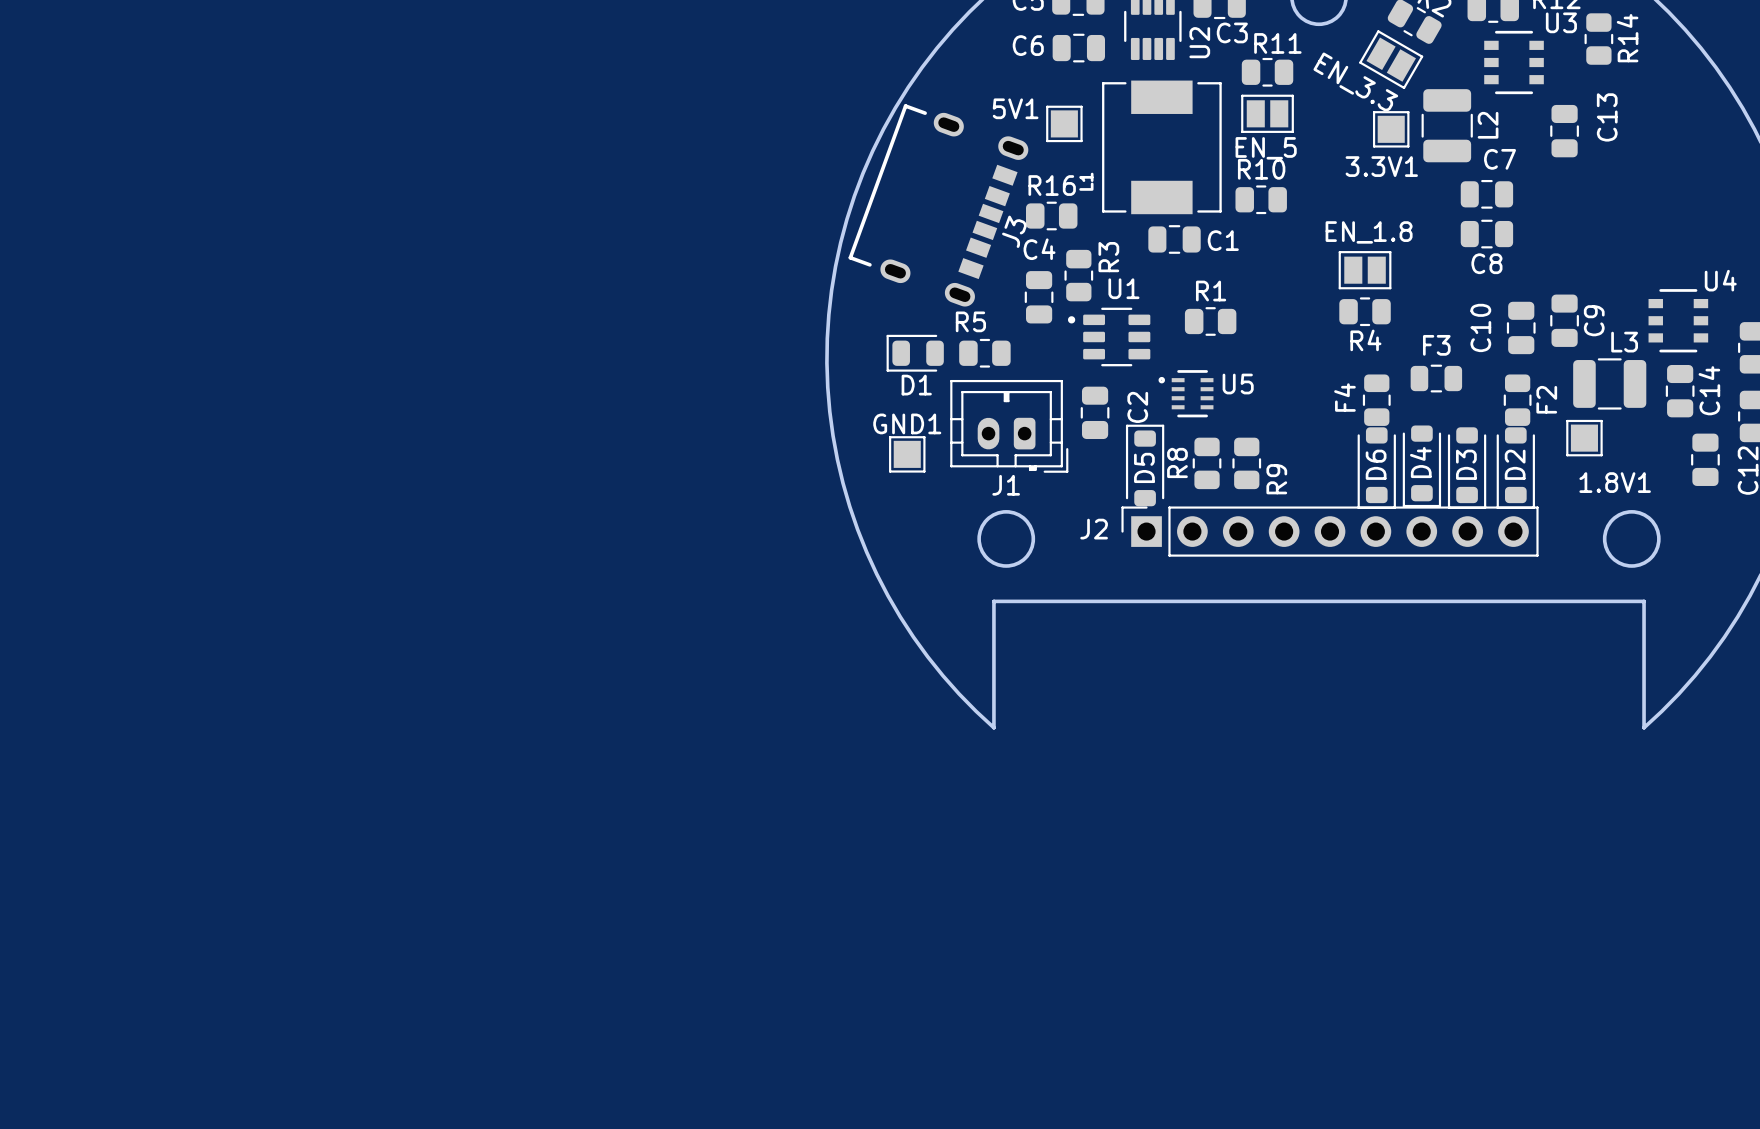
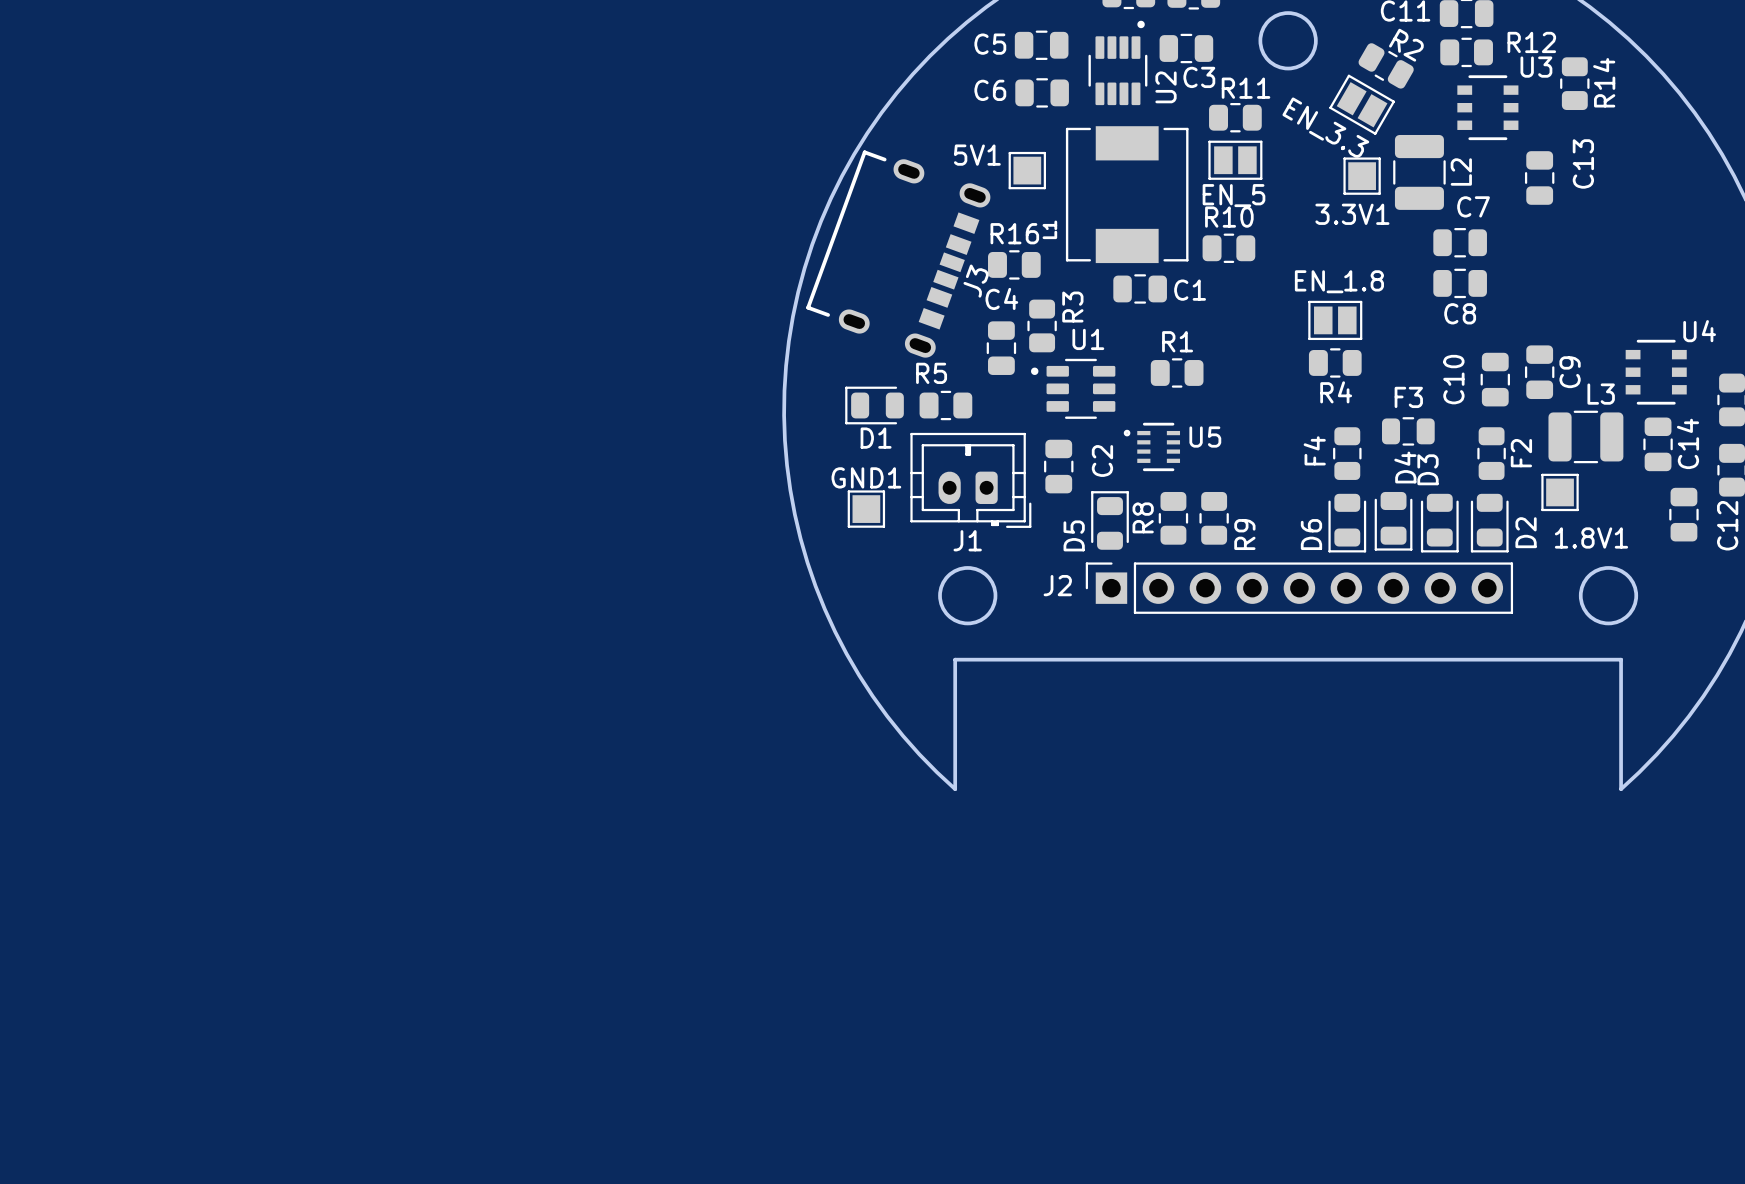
D5 footprint: [1125, 424, 1165, 507] -> [1091, 491, 1129, 550]
D4 footprint: [1402, 425, 1442, 508] -> [1374, 491, 1413, 551]
D6 footprint: [1357, 427, 1396, 509] -> [1328, 493, 1367, 553]
D3 footprint: [1447, 427, 1487, 509] -> [1420, 493, 1459, 553]
D2 footprint: [1496, 427, 1535, 509] -> [1470, 493, 1509, 553]
D4 name position: D4 (1420, 462) -> D4 (1405, 467)
D6 name position: D6 (1376, 464) -> D6 (1311, 534)
D3 name position: D3 (1466, 464) -> D3 (1428, 469)
D2 name position: D2 (1515, 464) -> D2 (1526, 532)
D5 name position: D5 (1144, 467) -> D5 (1074, 535)

